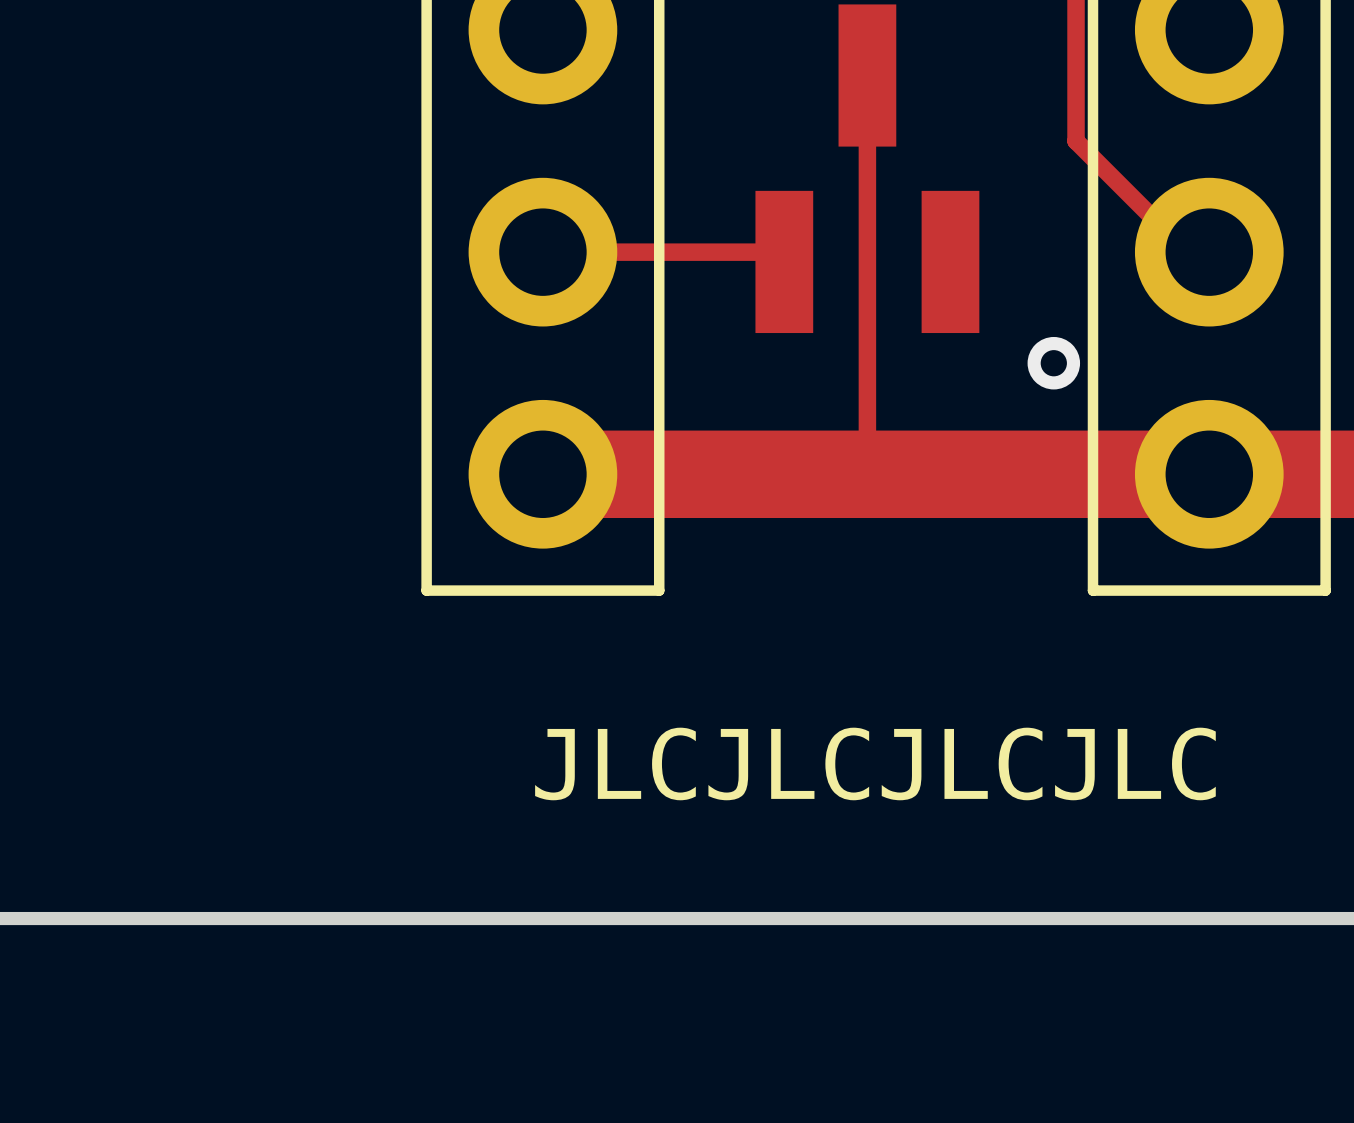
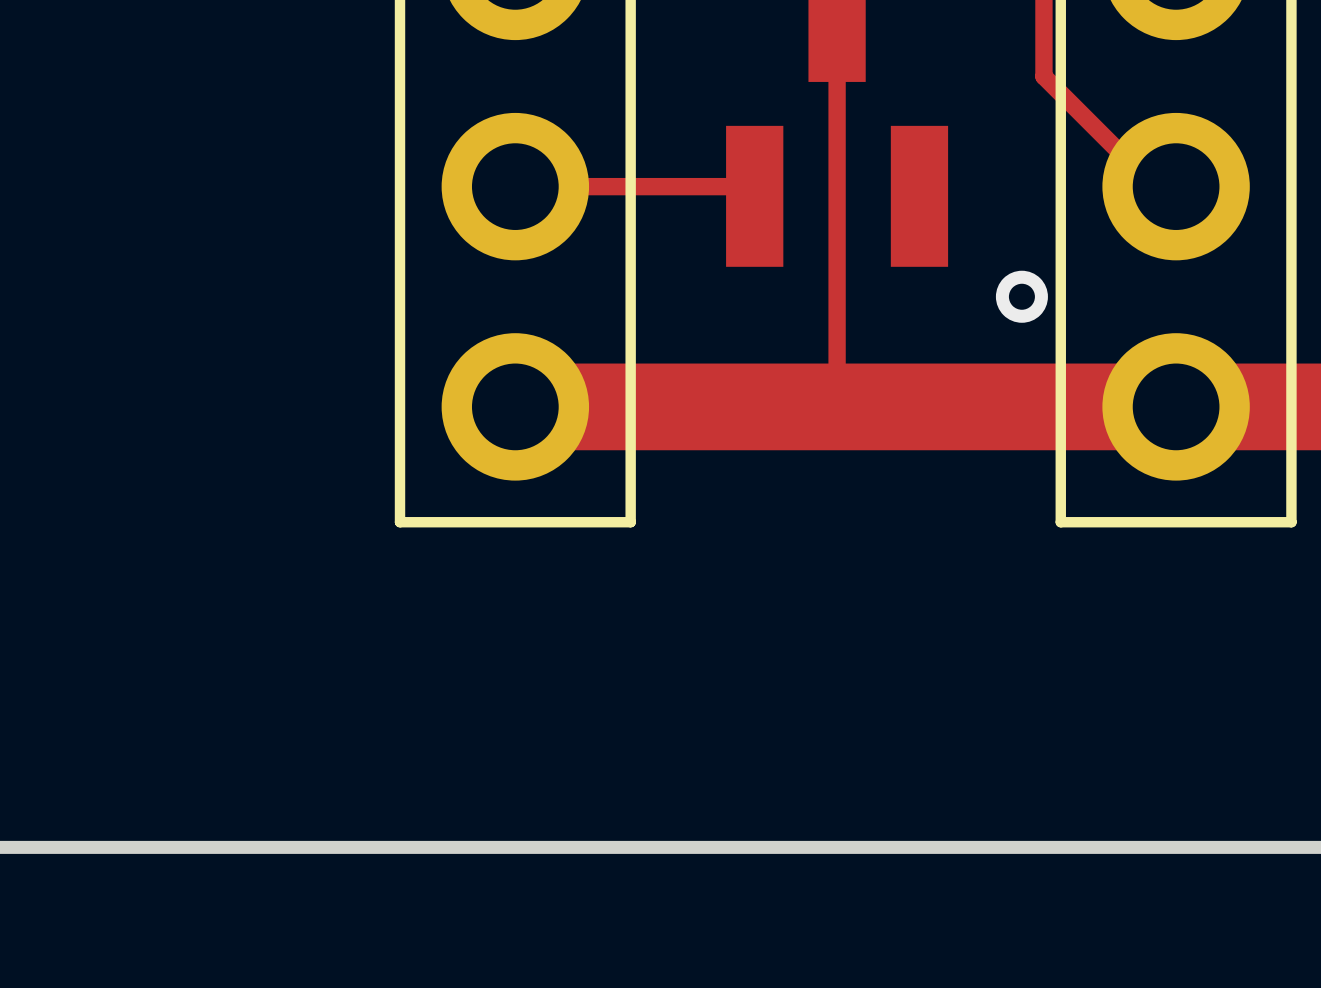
text: JLCJLCJLCJLC (875, 763) -> none

